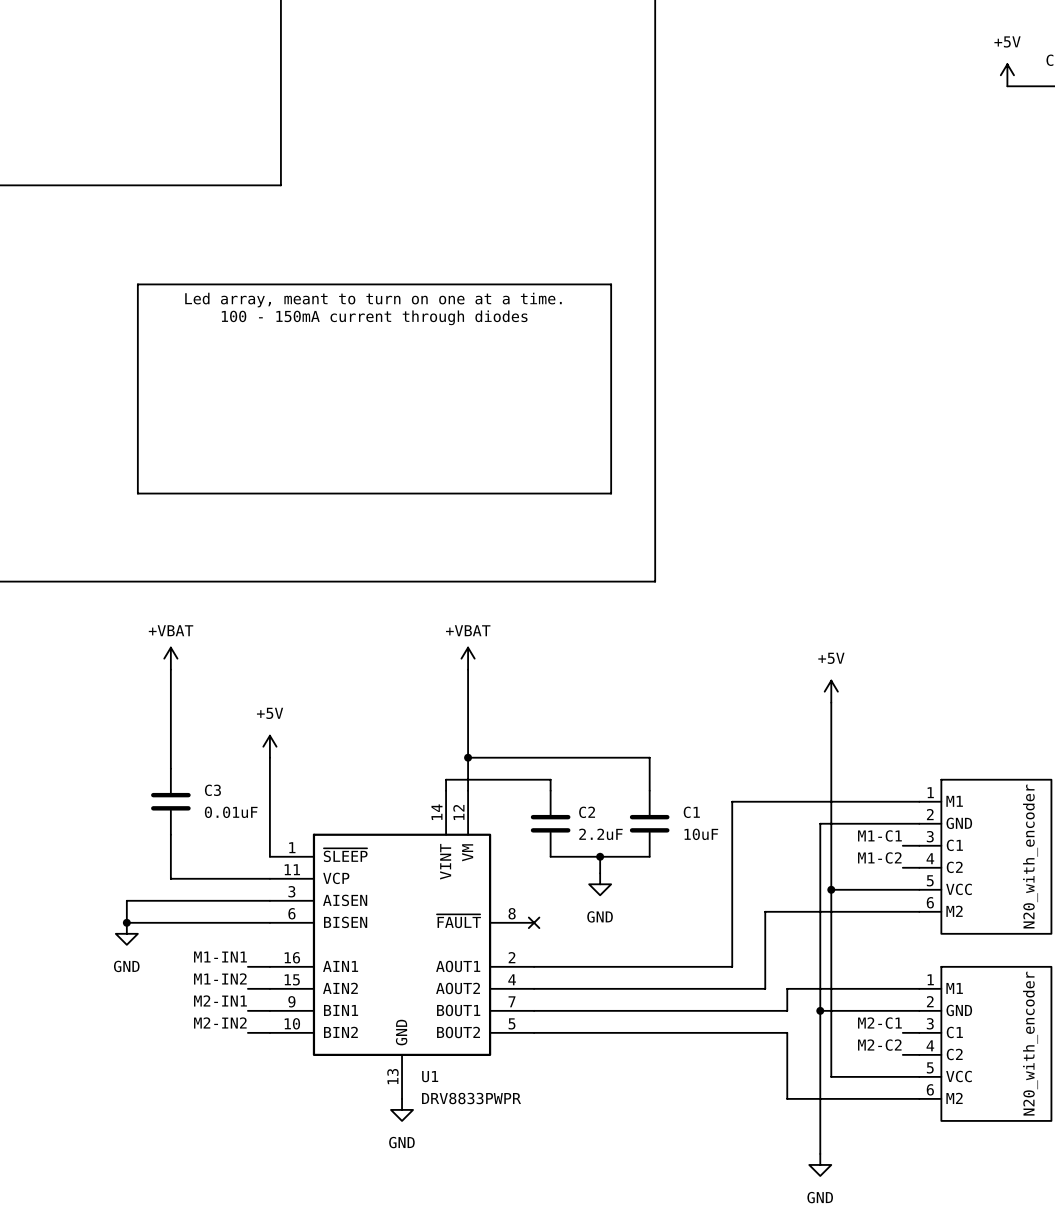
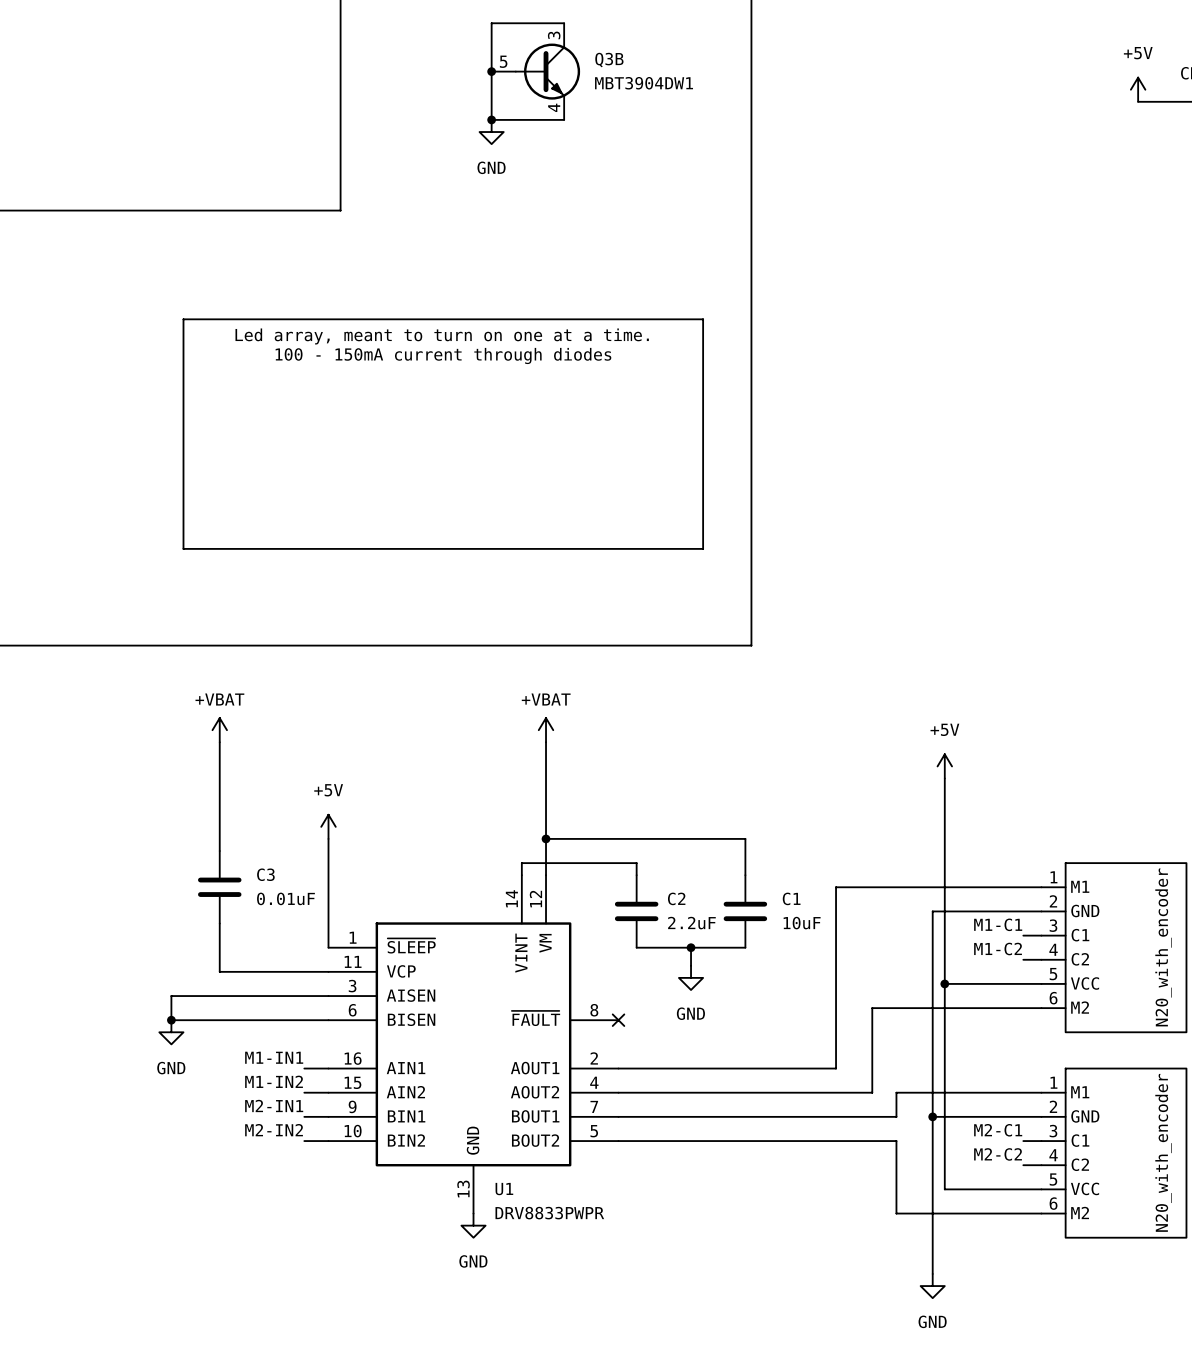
wire: none -> (564, 23) (491, 23) (491, 119) (564, 119)
junction: none -> (491, 71)
Q3B: none -> MBT3904DW1 (535, 71)
junction: none -> (491, 119)
power symbol: none -> GND (491, 132)

